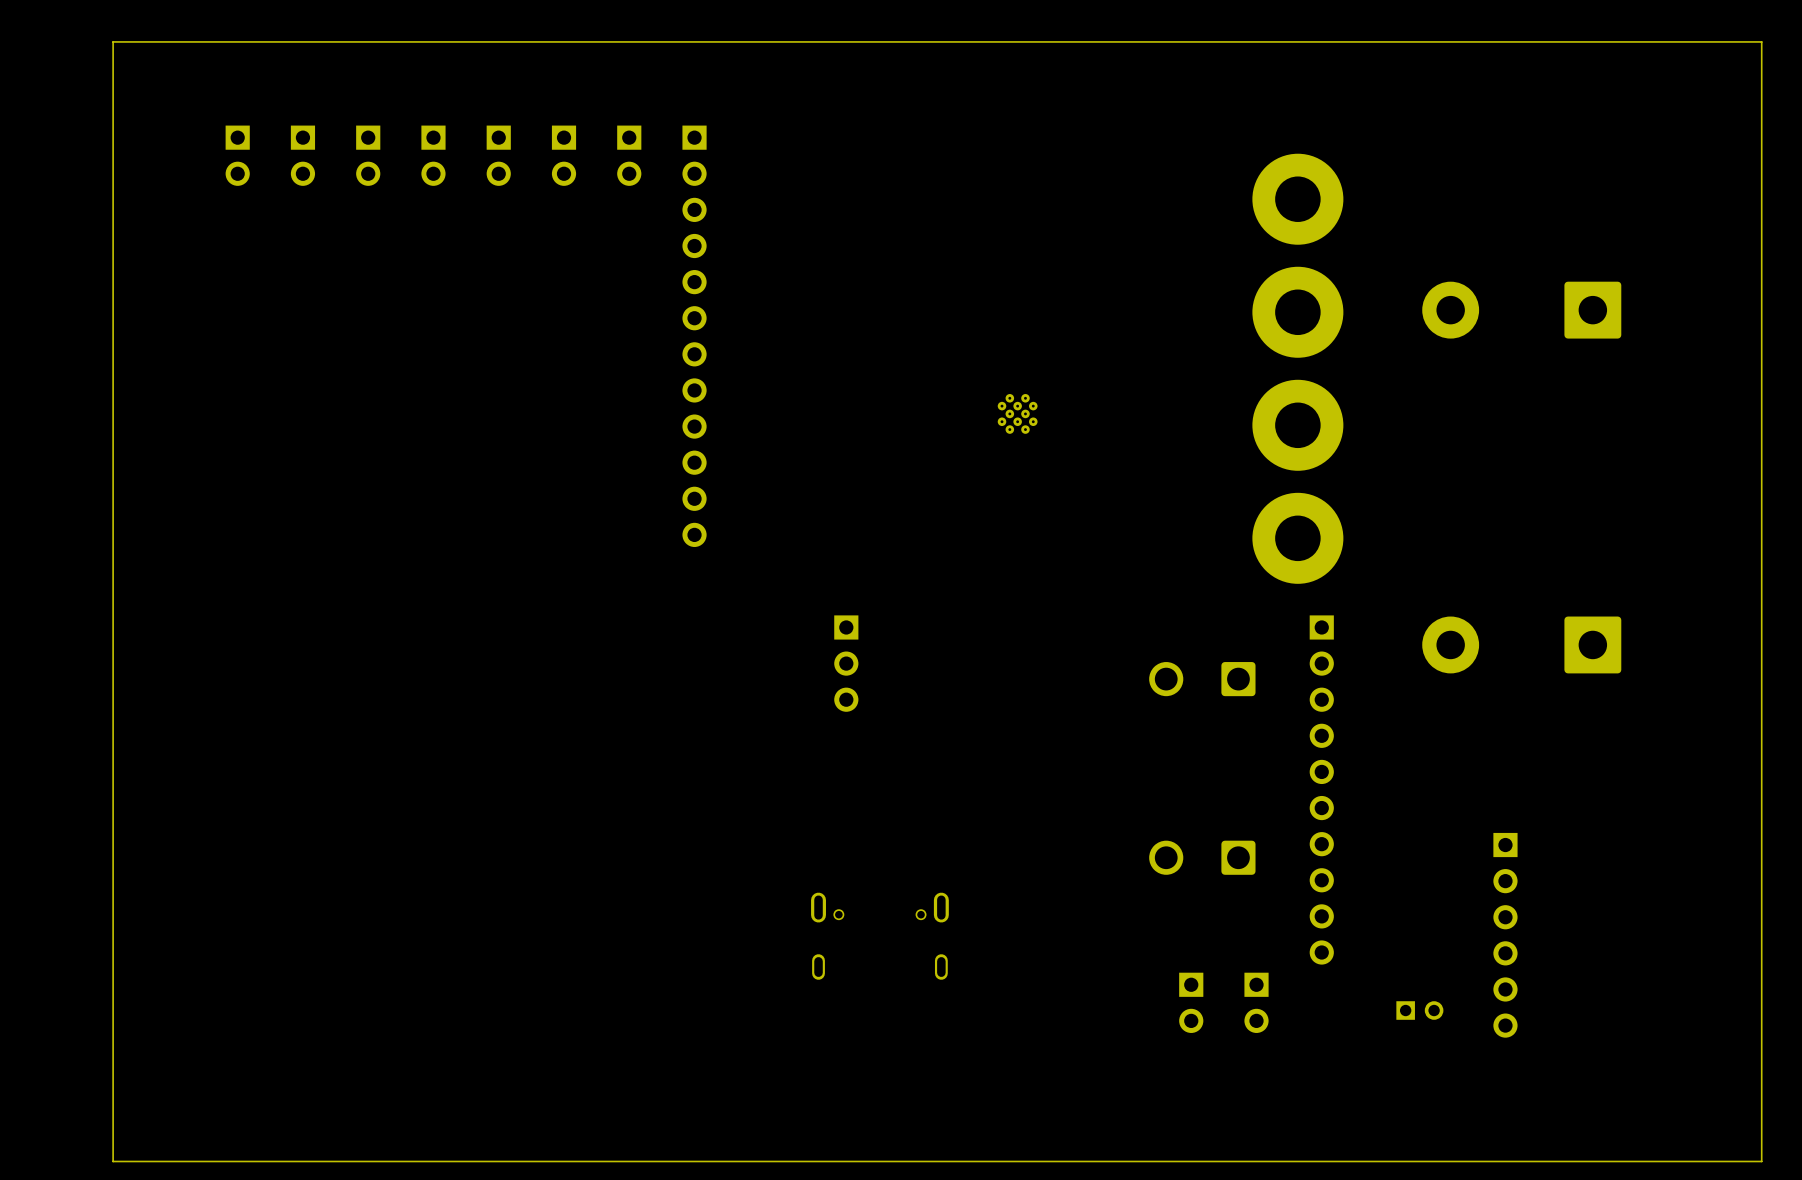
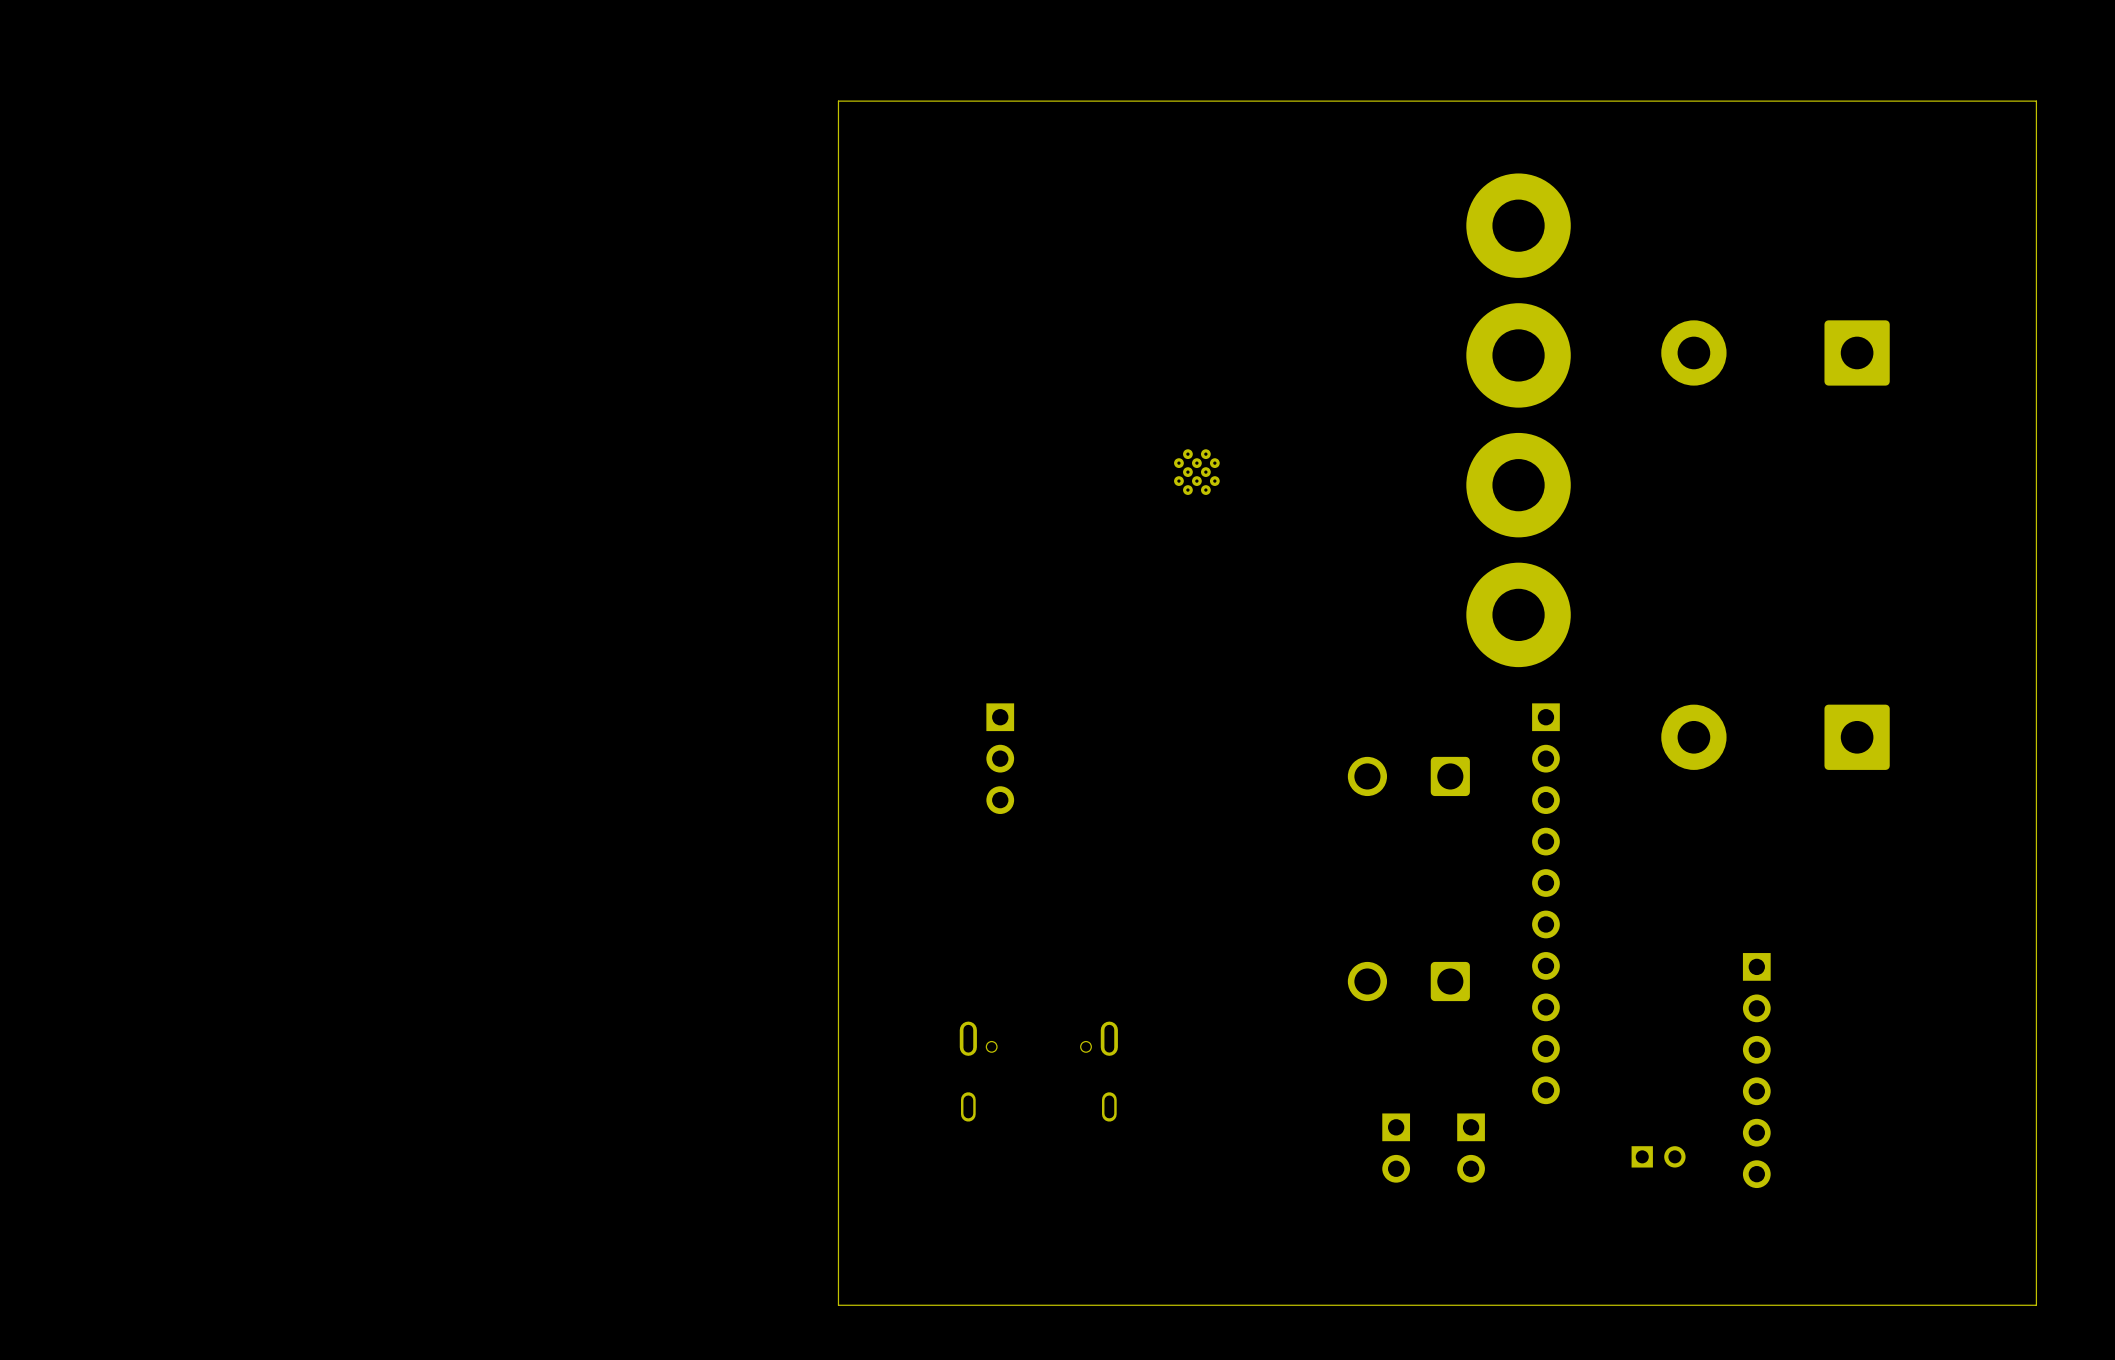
board edge: (1761, 41) (113, 41) (113, 1161) (1761, 1161) (1761, 41) -> (2036, 101) (2036, 1305) (838, 1305) (838, 101) (2036, 101)
part: (237, 155) -> none
part: (302, 155) -> none
part: (368, 155) -> none
part: (433, 155) -> none
part: (498, 155) -> none
part: (564, 155) -> none
part: (629, 155) -> none
part: (694, 336) -> none

